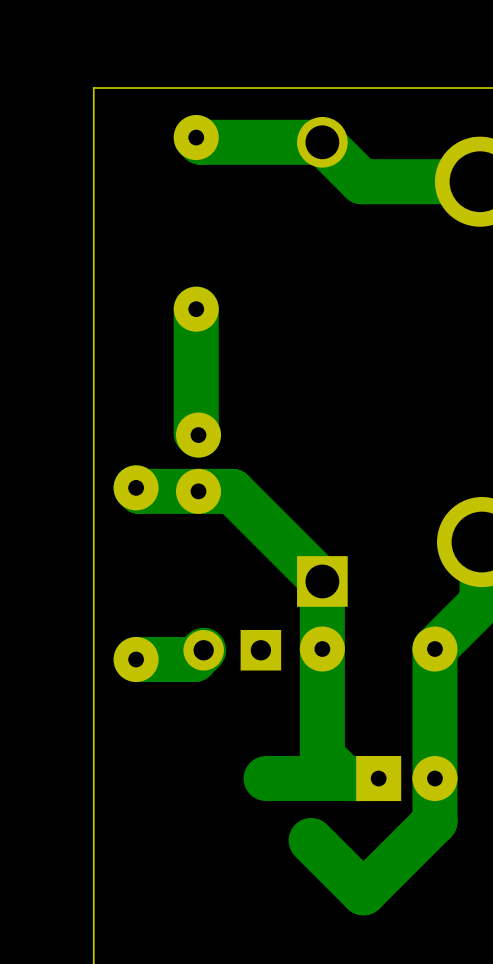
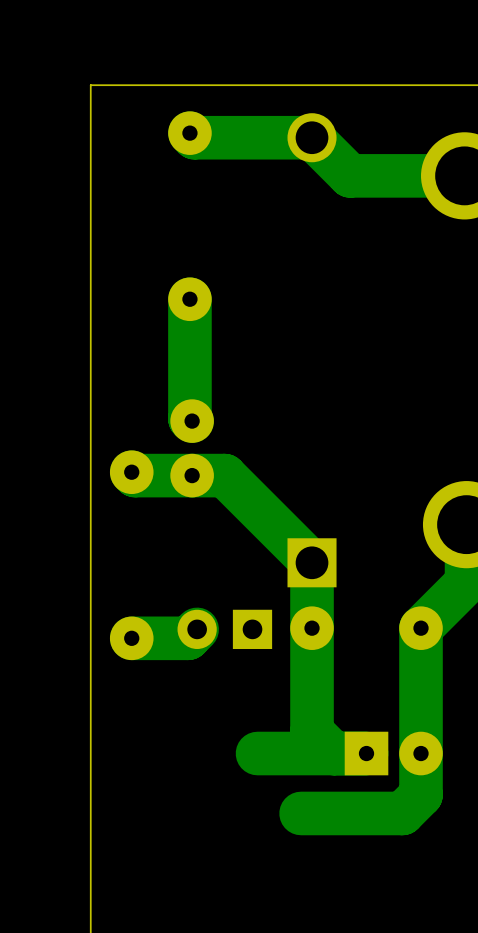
track: (415, 840) (363, 892) (311, 840) -> (402, 813) (301, 813)

